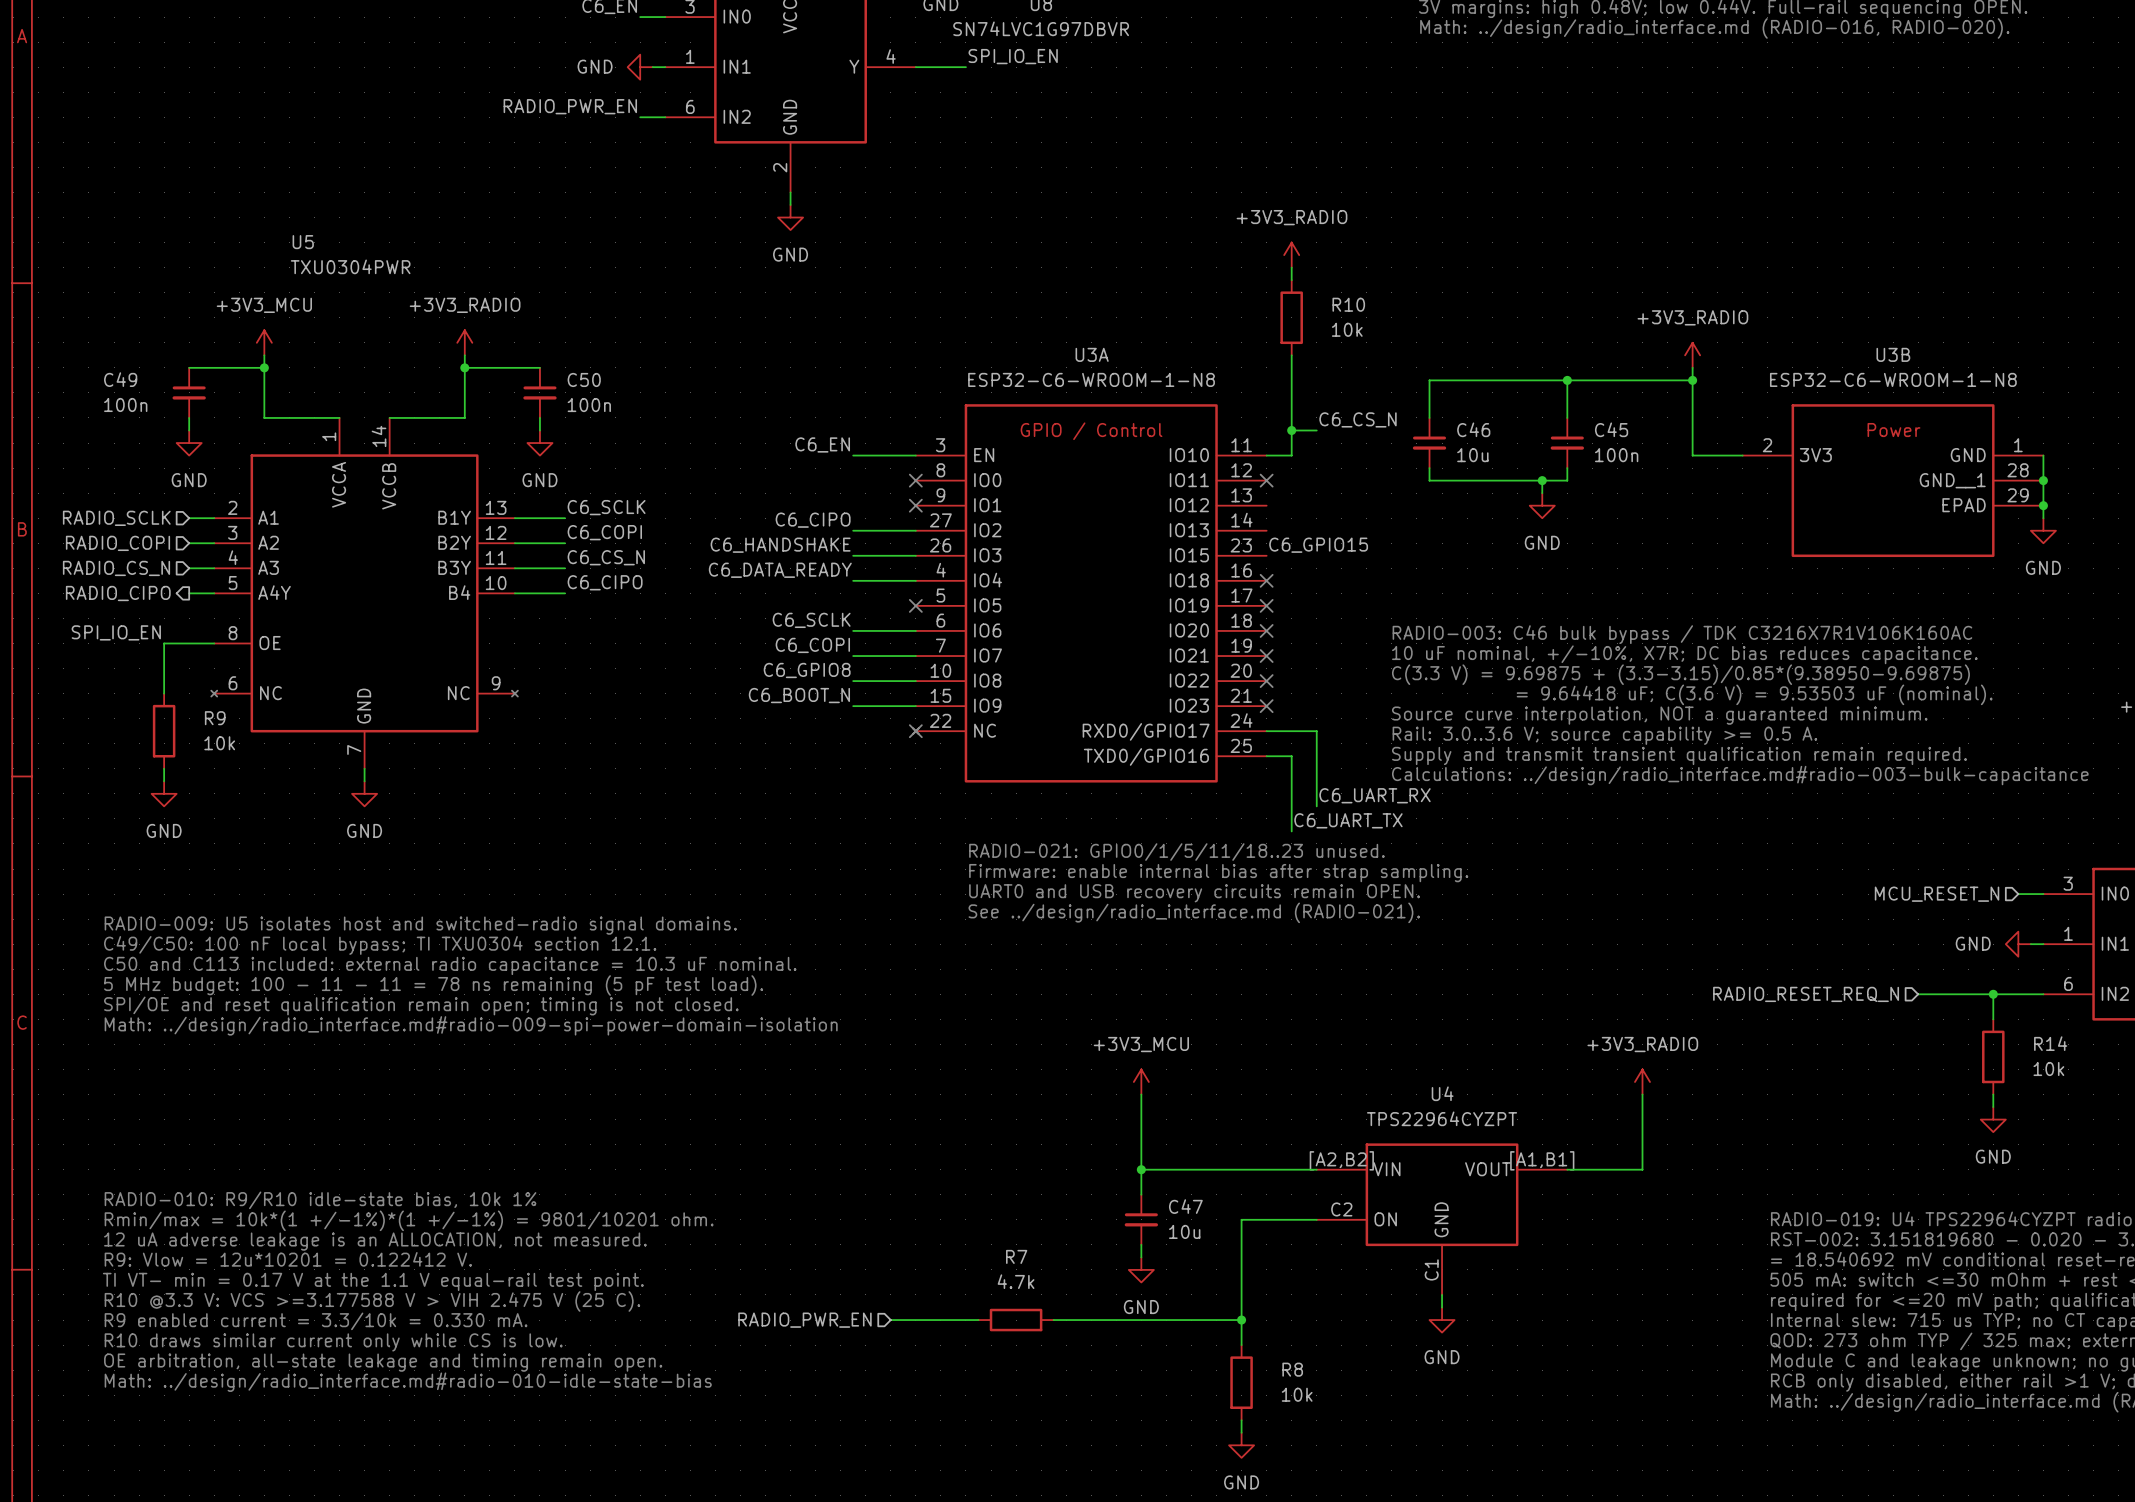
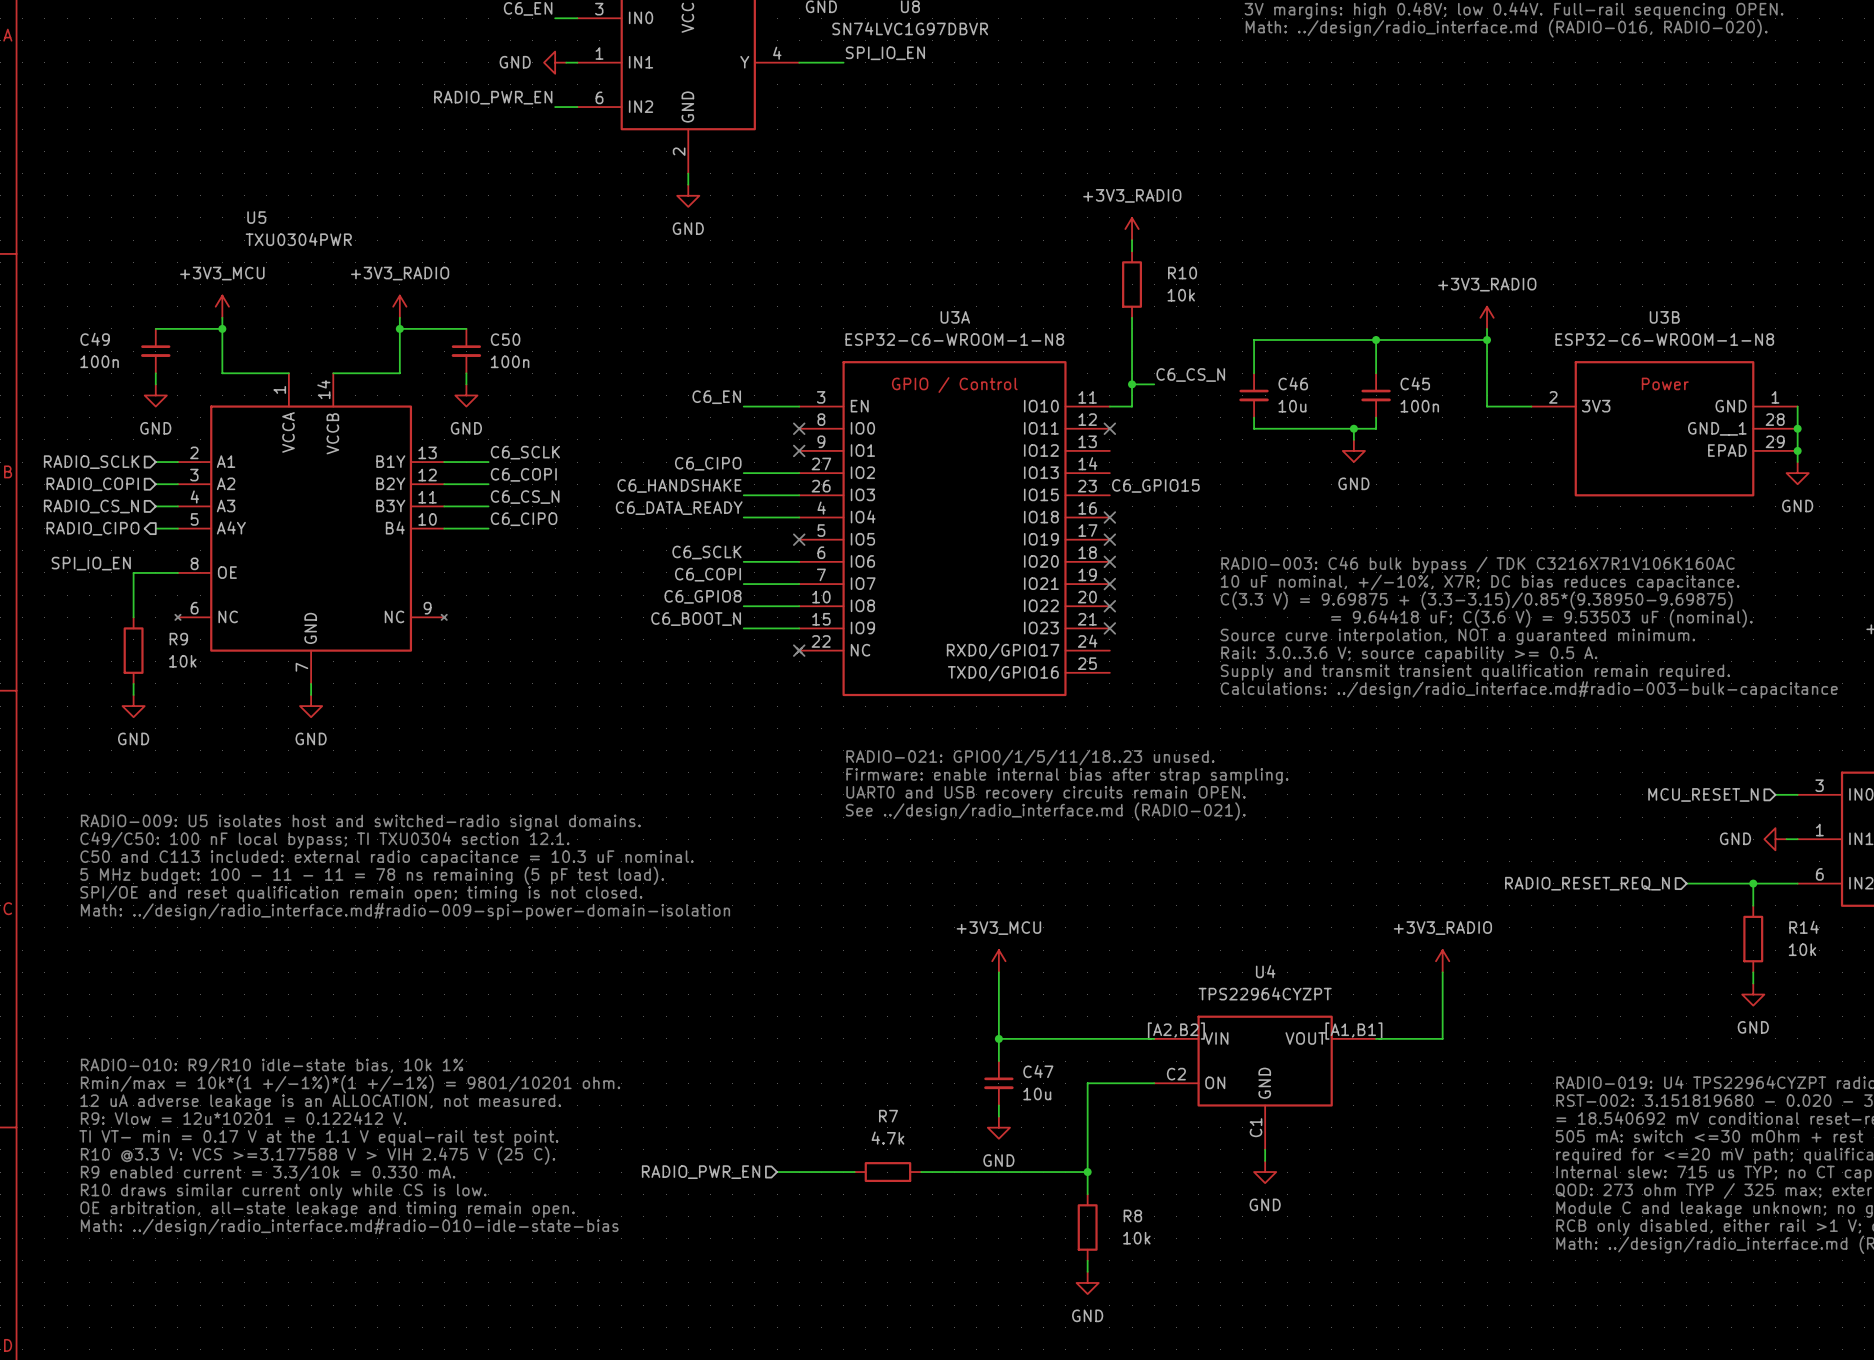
wire: (1266, 731) (1316, 731) (1316, 806) -> none
wire: (1266, 756) (1291, 756) (1291, 831) -> none
label: C6_UART_RX (1375, 795) -> none
label: C6_UART_TX (1348, 820) -> none

